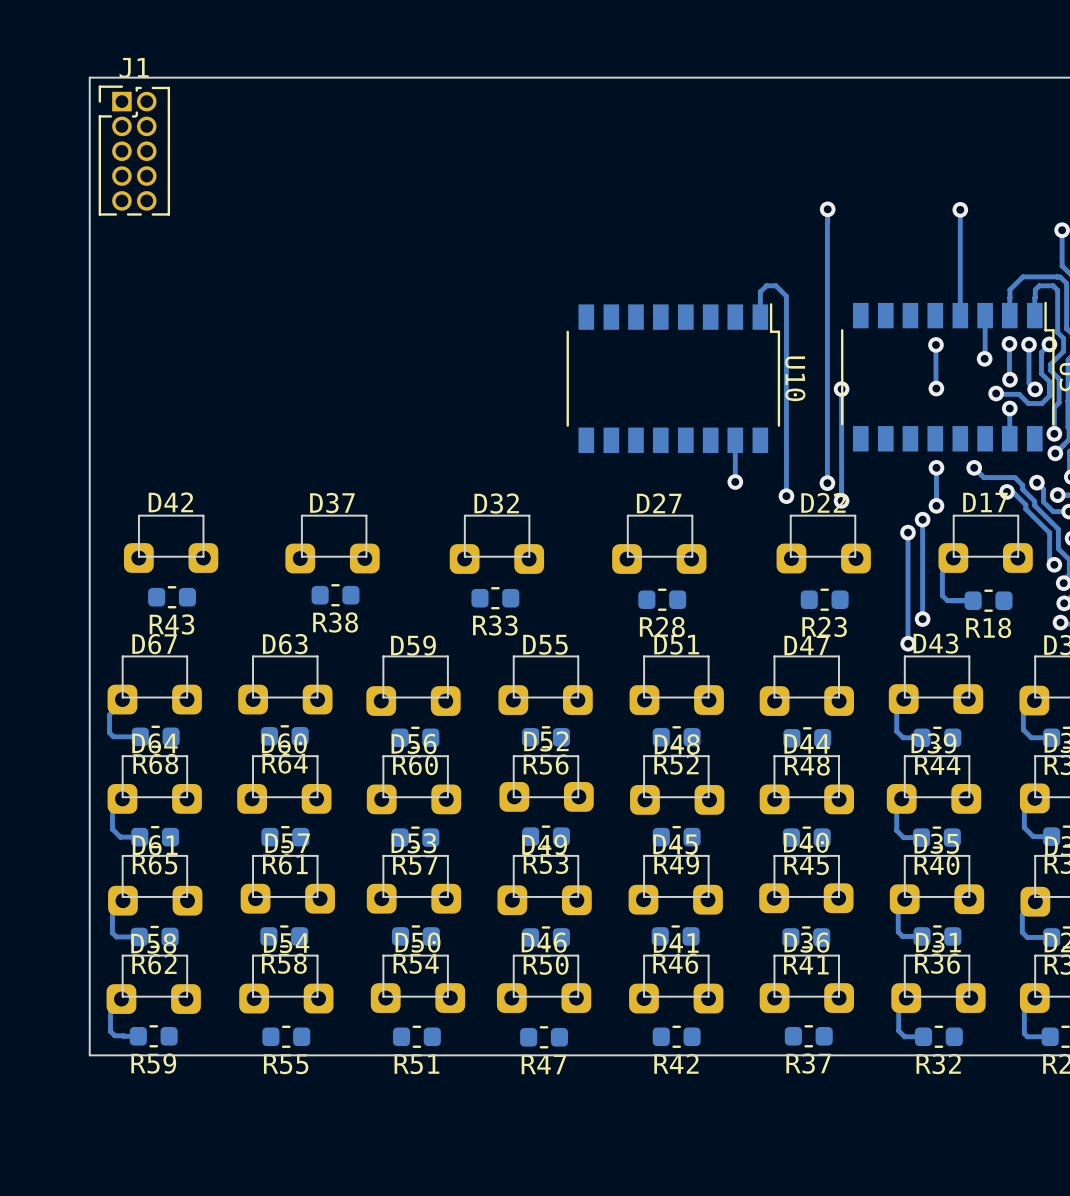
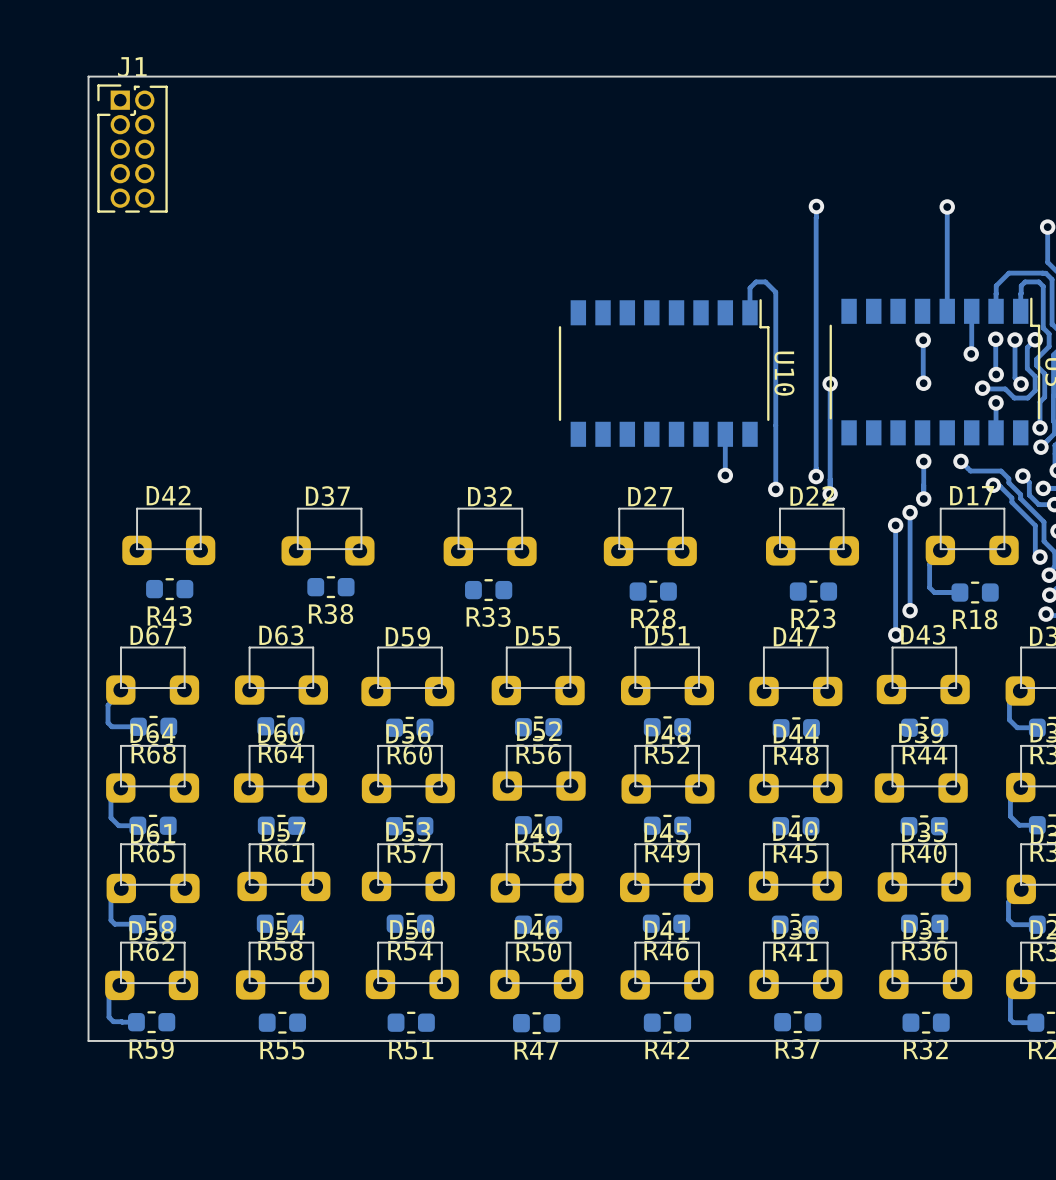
track: (899, 702) (896, 706) (896, 731) (903, 737) (922, 737) -> none
track: (898, 801) (896, 803) (896, 830) (903, 837) (921, 837) -> none
track: (904, 904) (898, 907) (898, 931) (902, 936) (922, 936) -> none
track: (901, 1003) (898, 1005) (898, 1030) (904, 1036) (923, 1036) -> none

